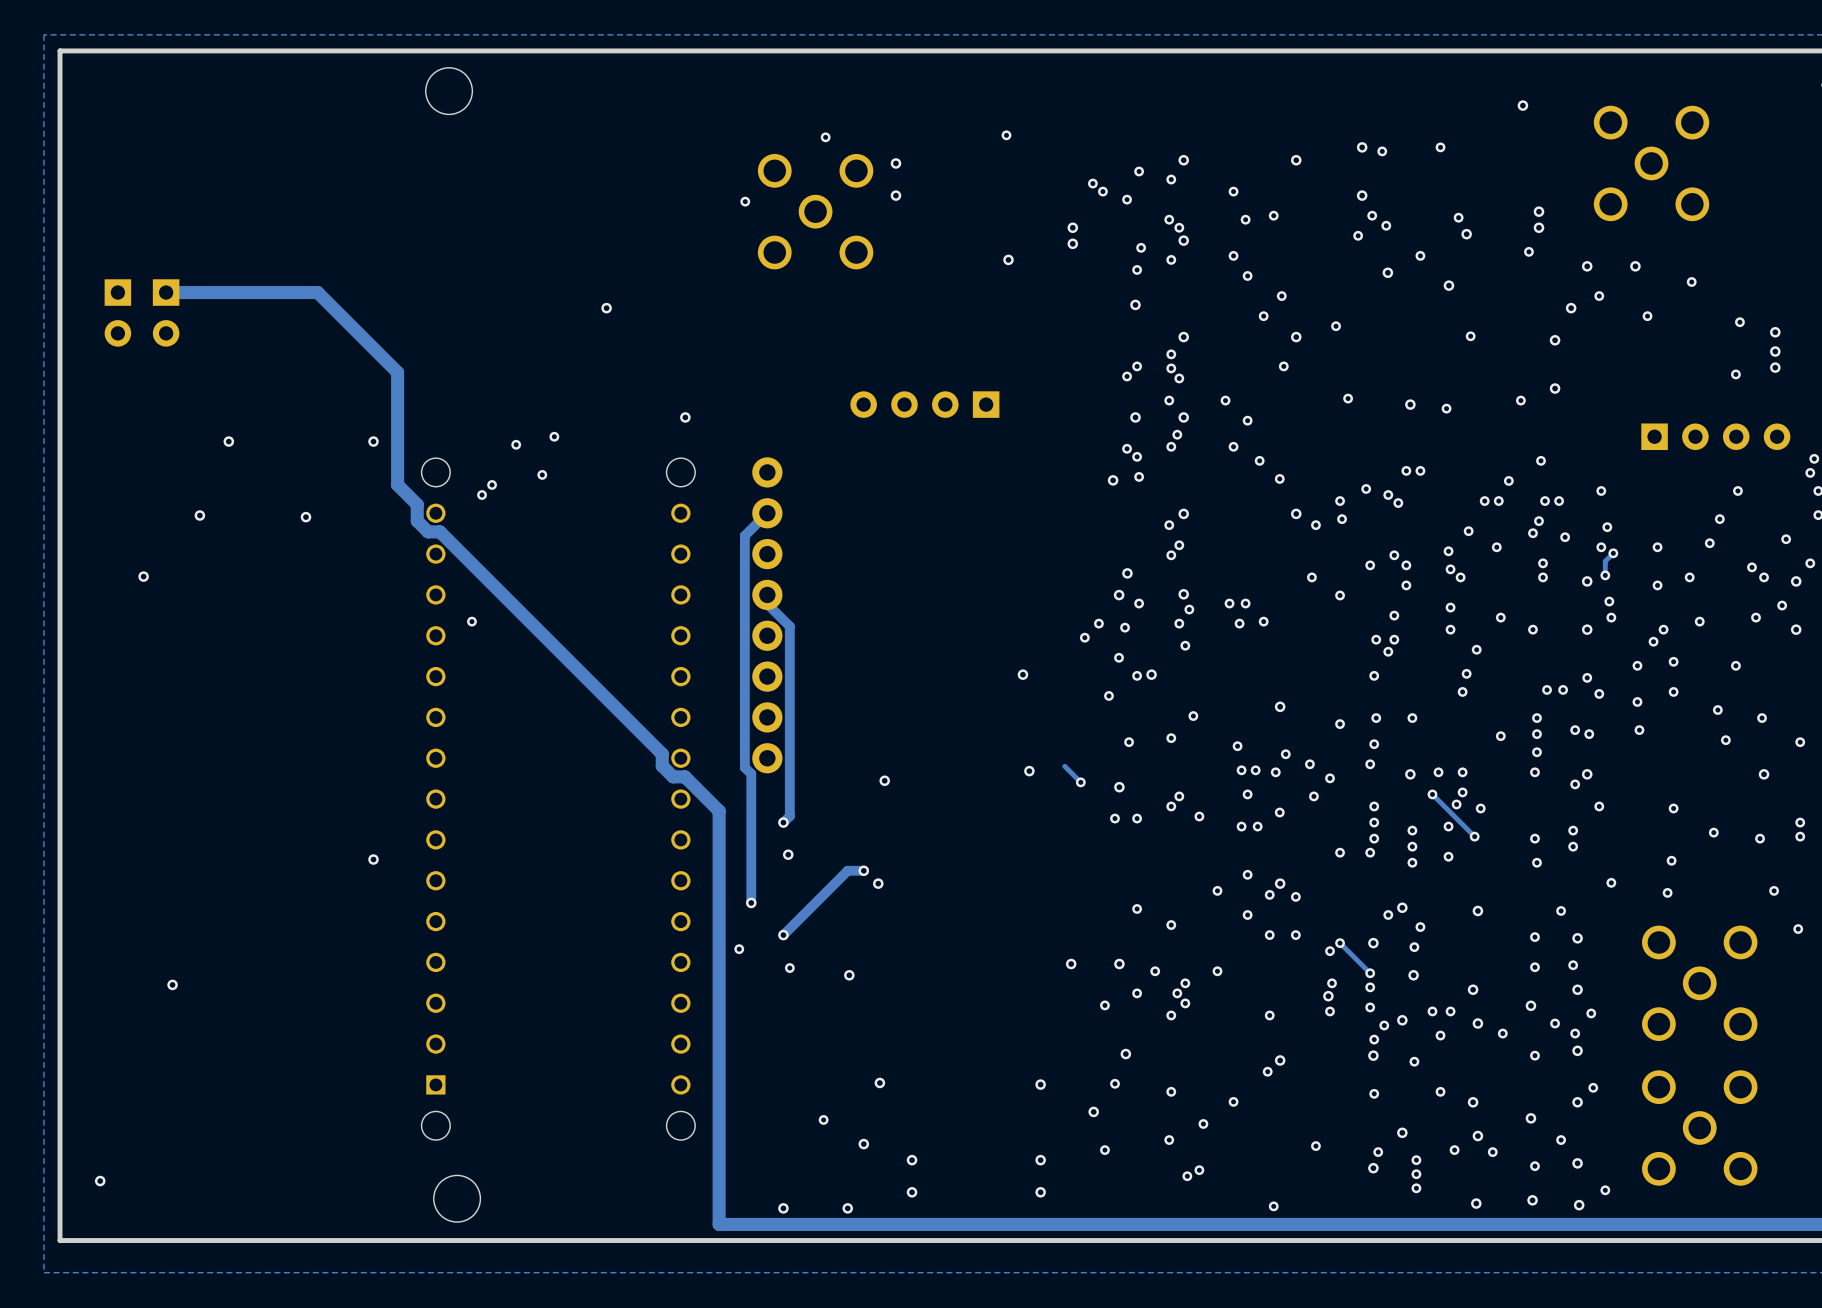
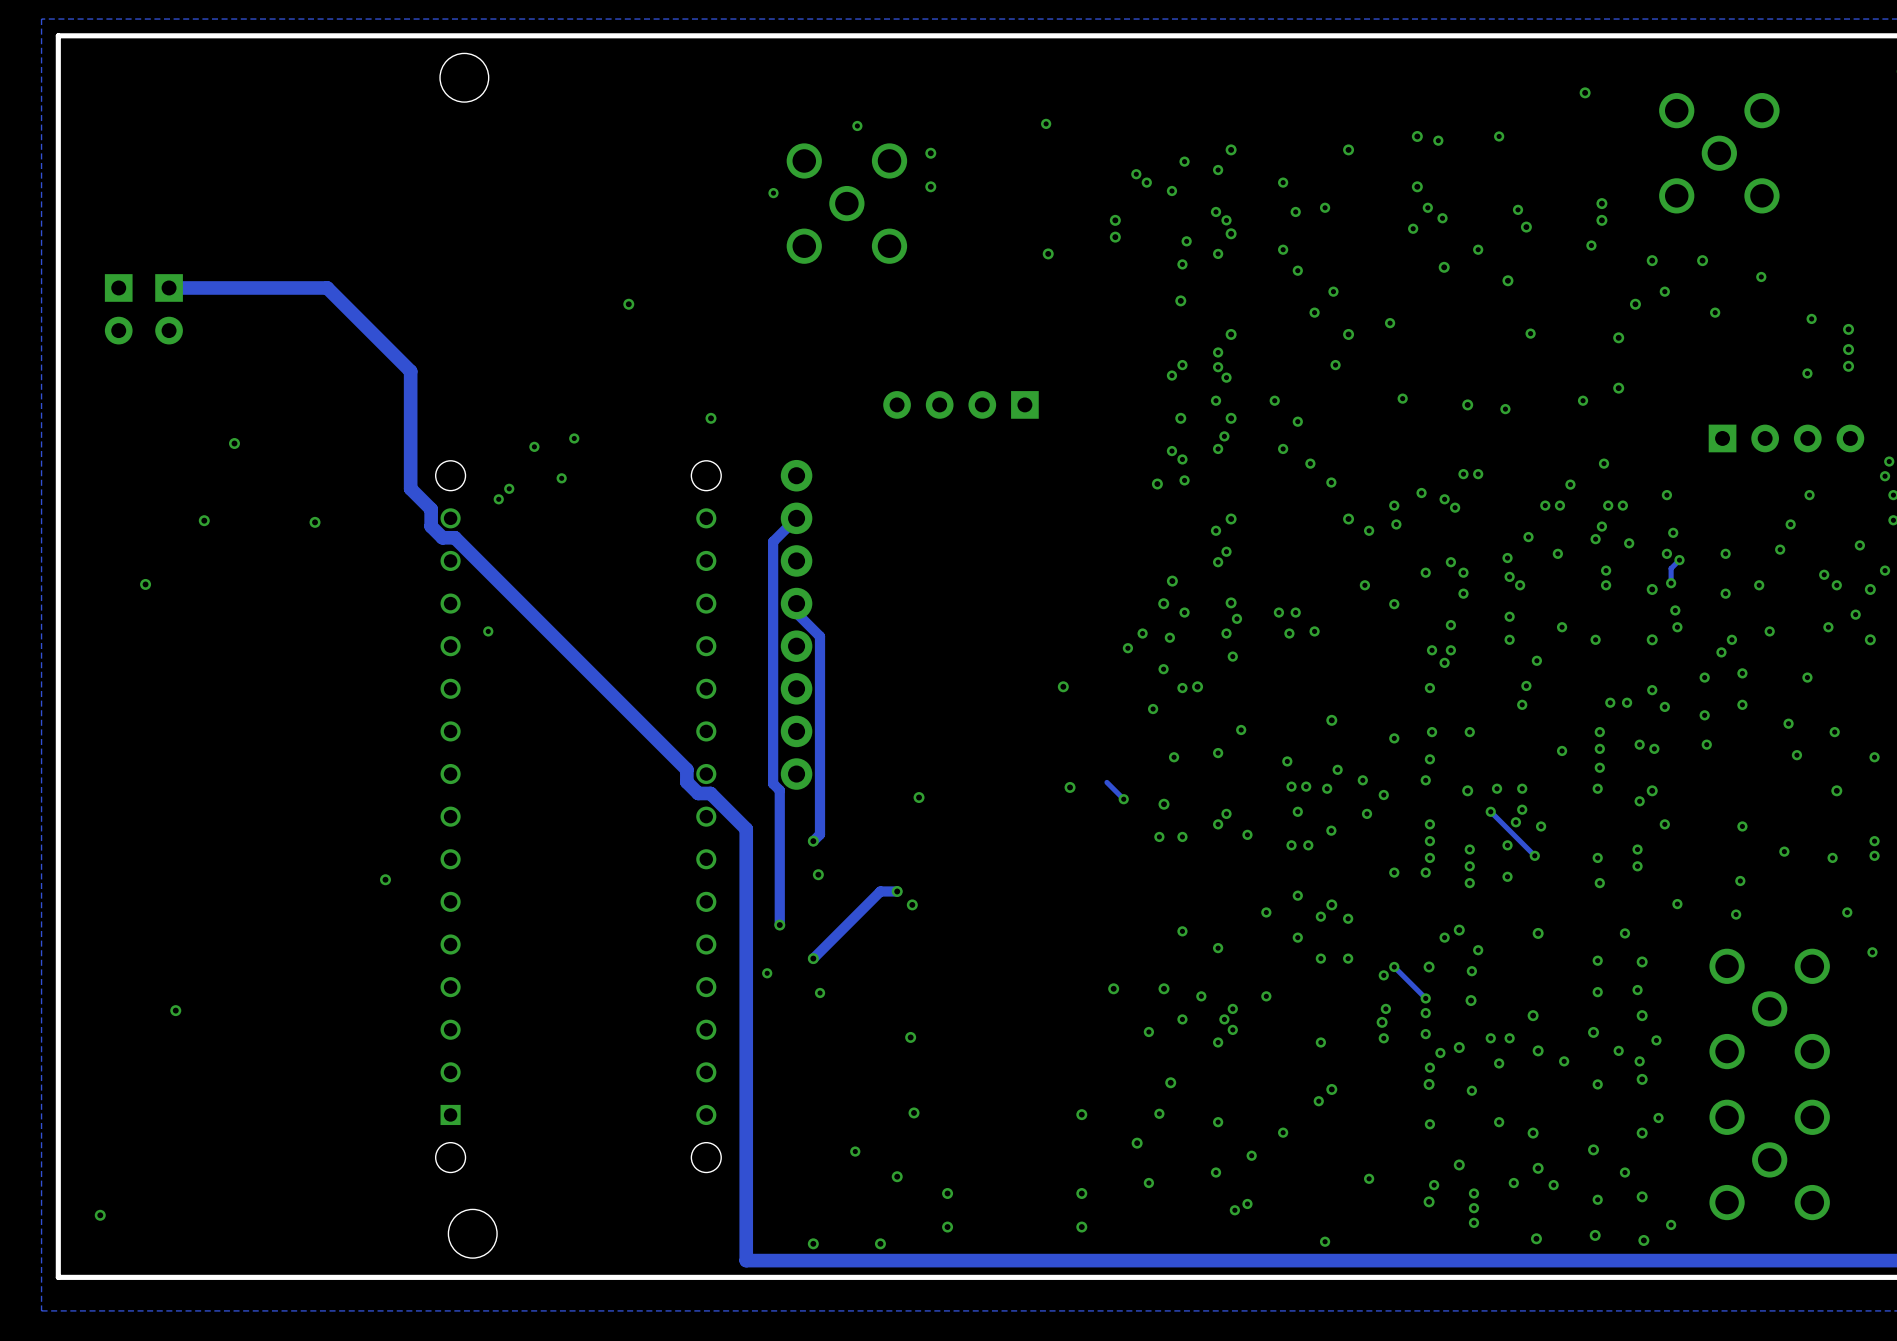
via: (373, 441) -> none
via position: (849, 975) -> (910, 1037)

